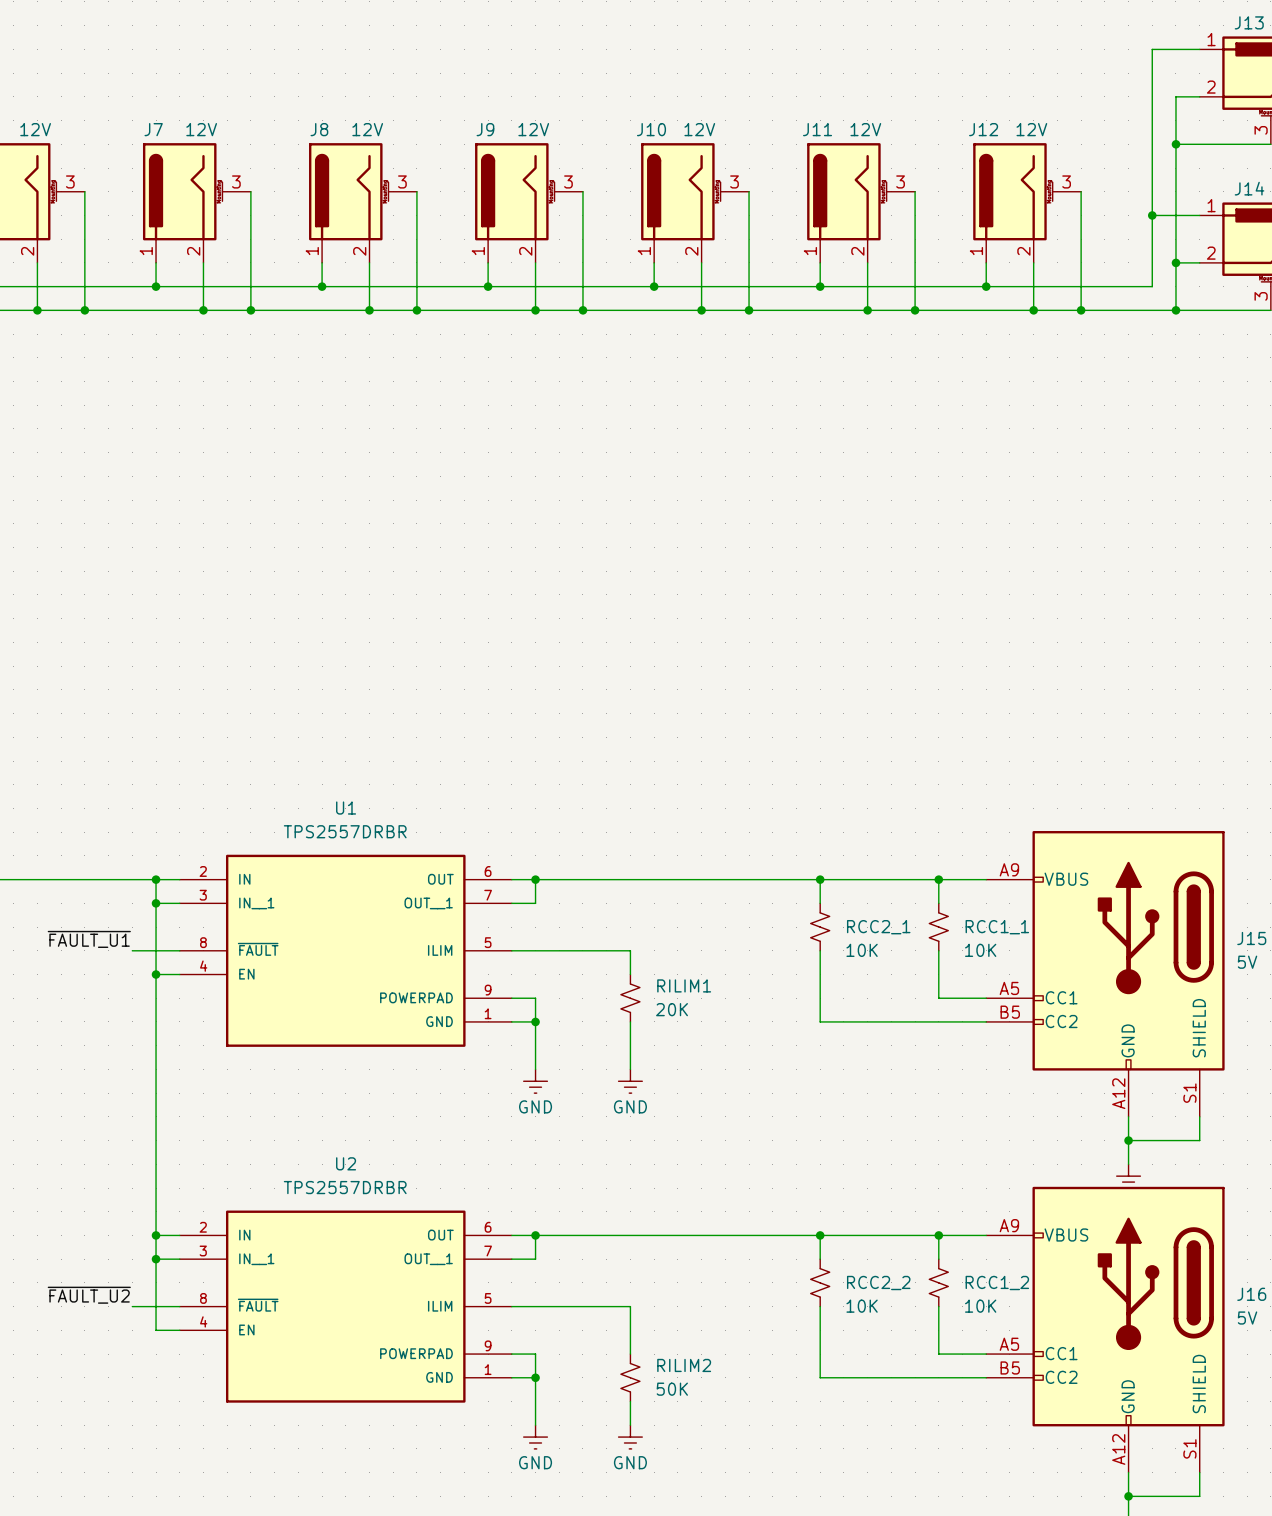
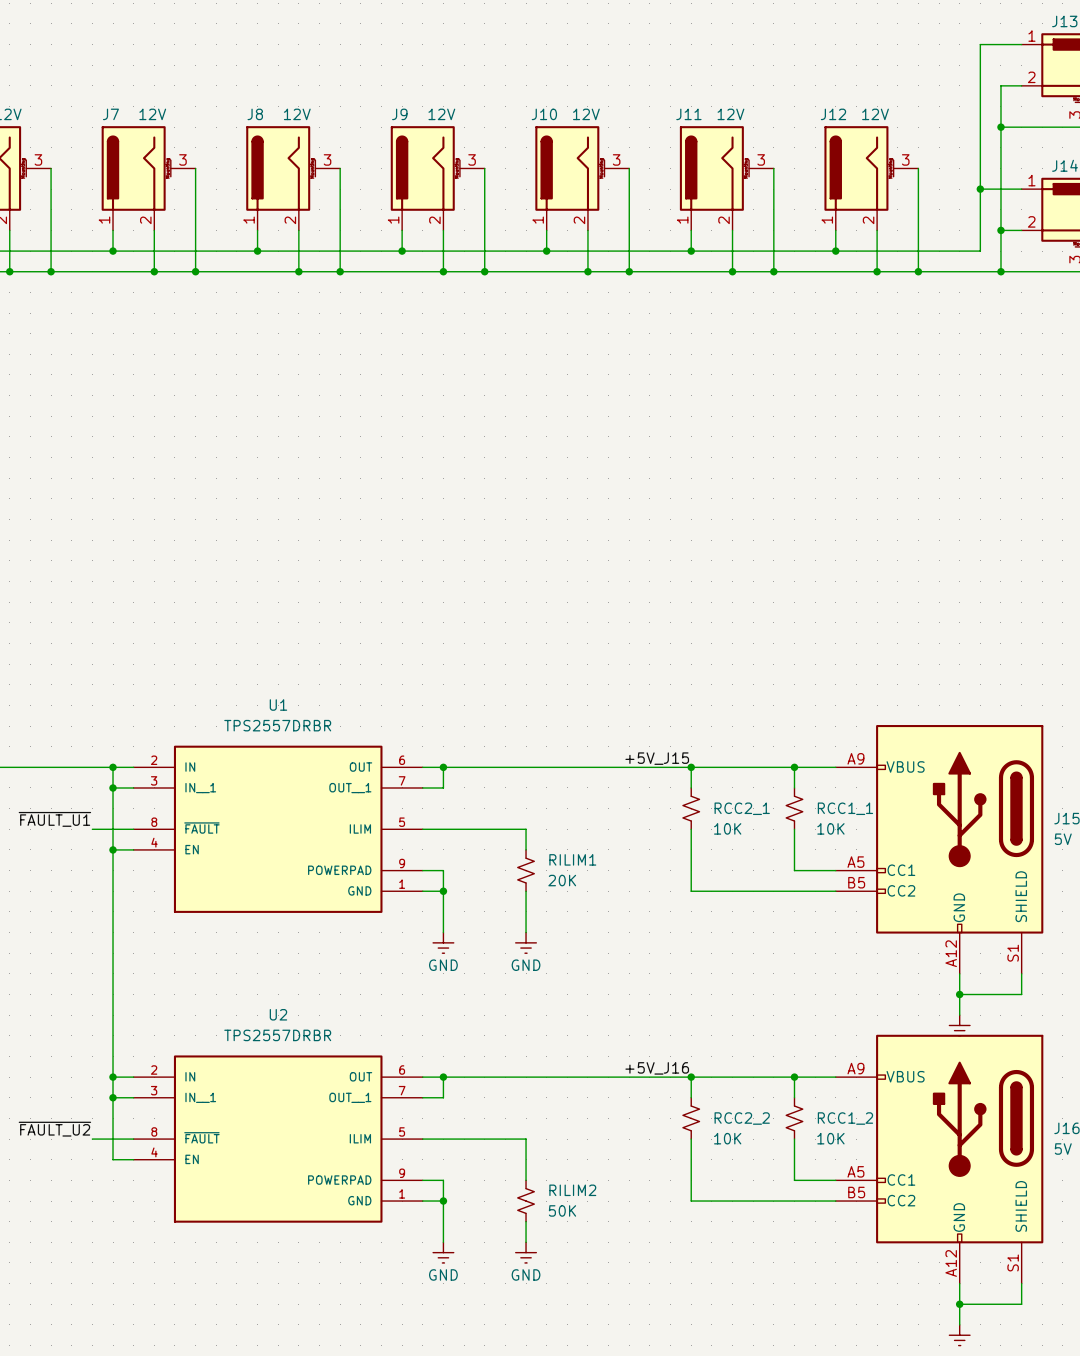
label: none -> +5V_J15 (657, 758)
label: none -> +5V_J16 (657, 1068)

